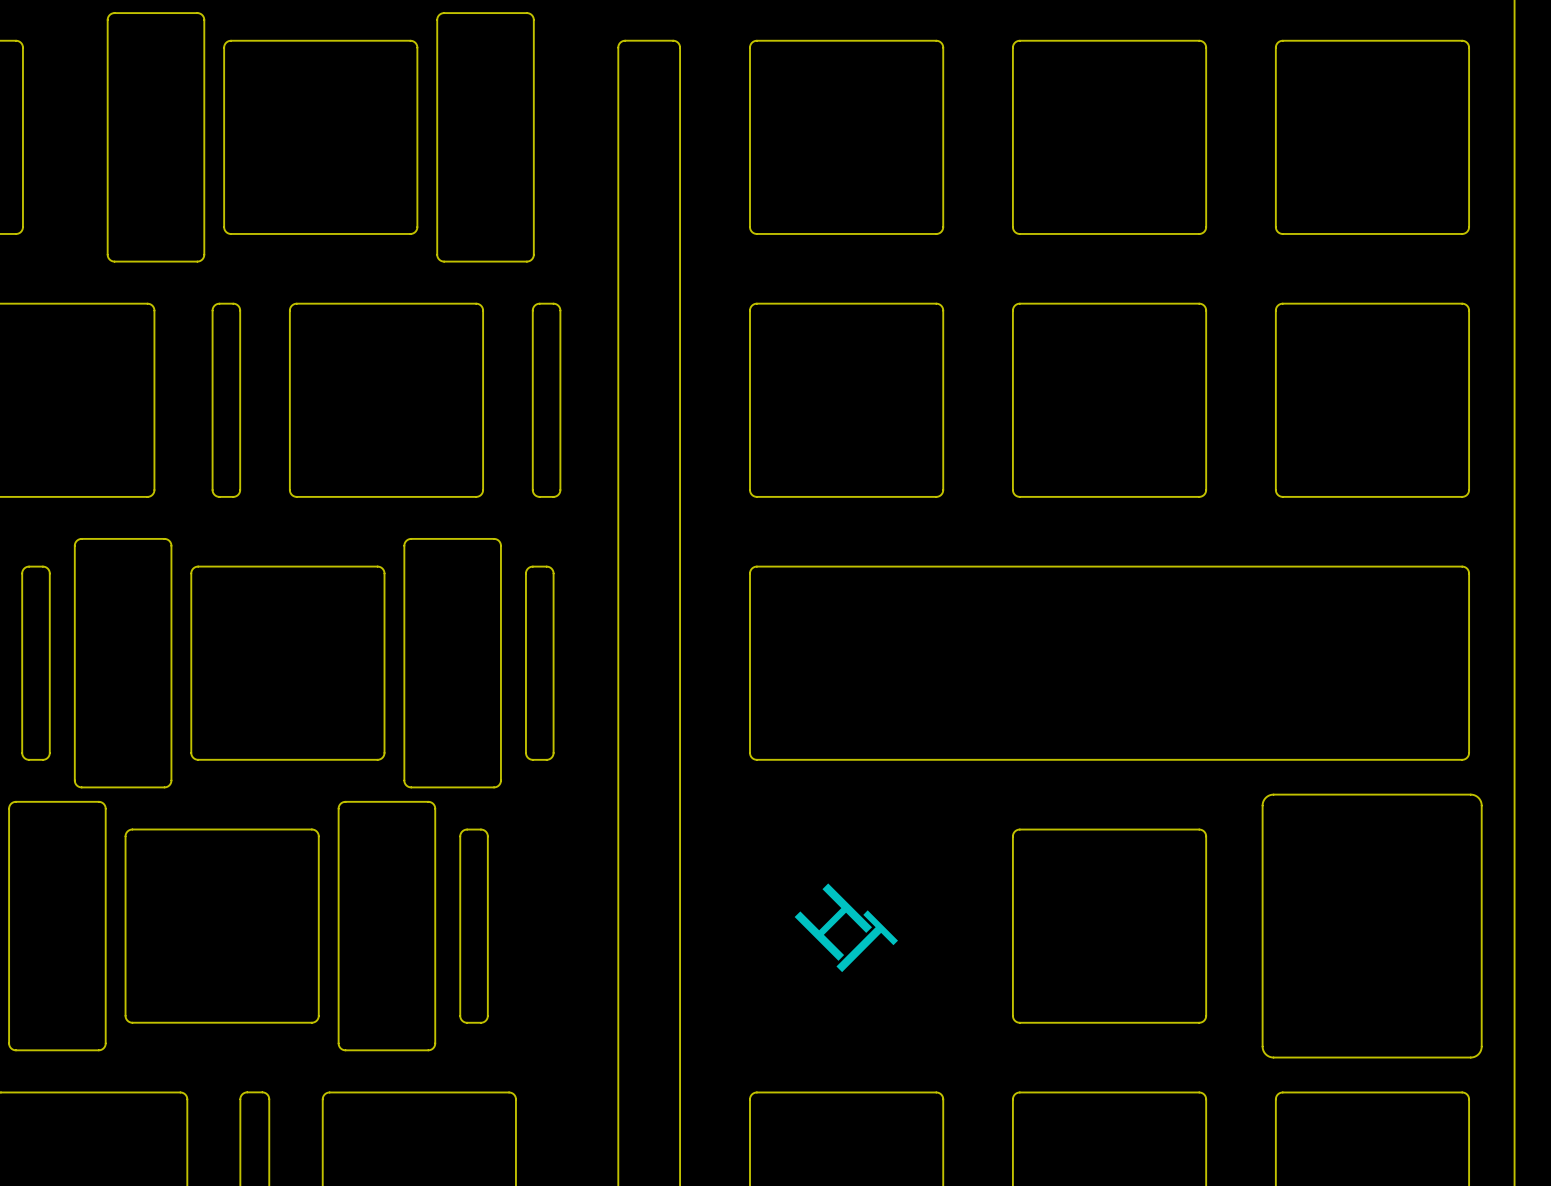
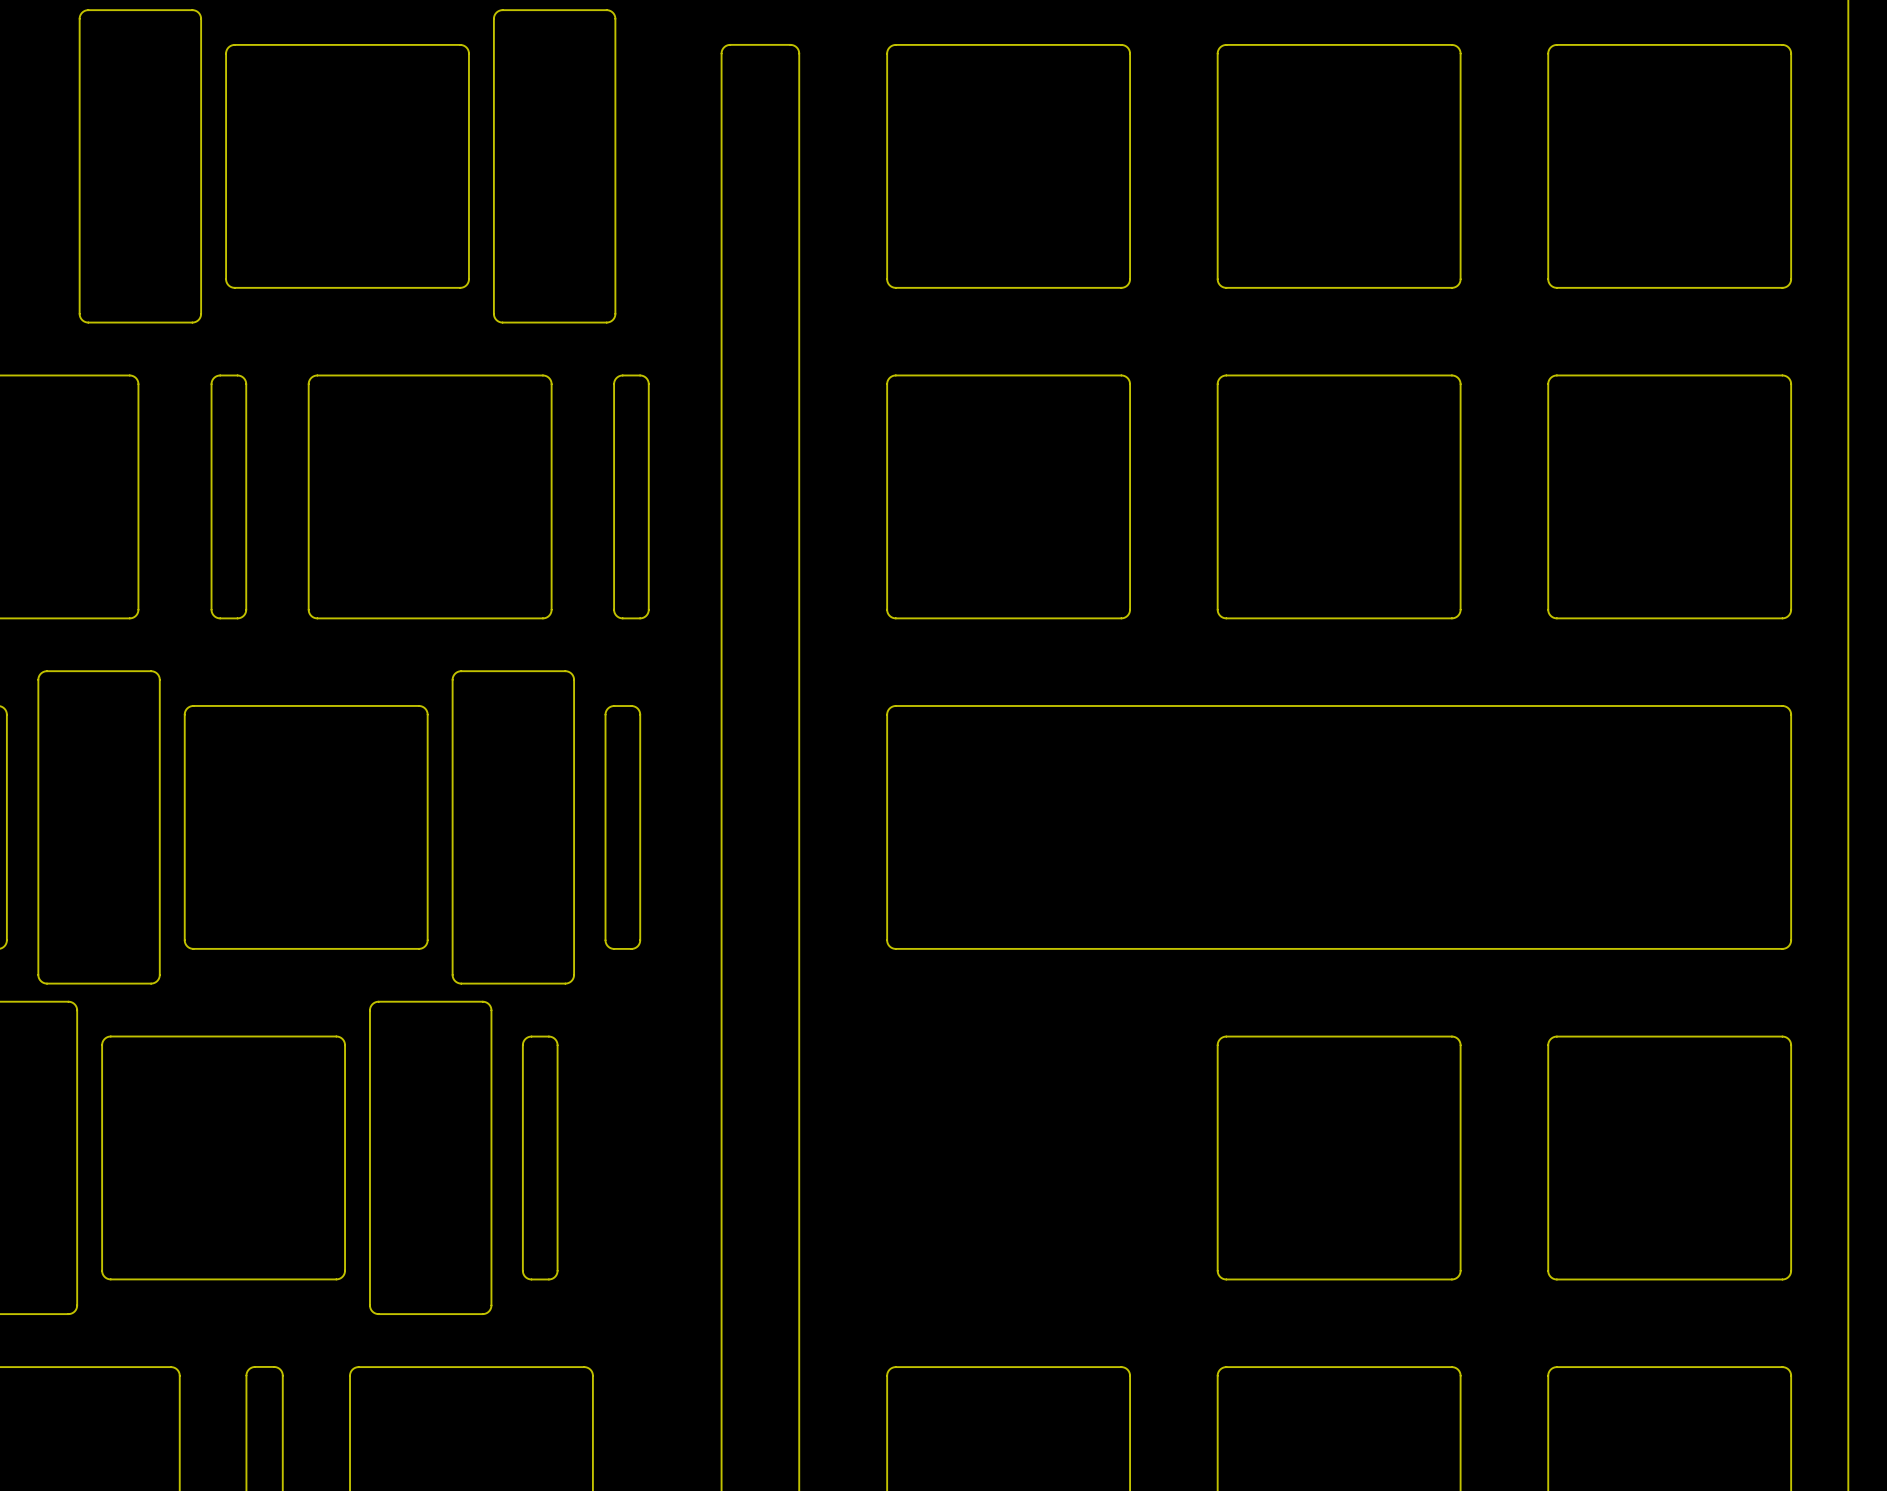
board edge: (1273, 794) (1470, 794) (1479, 798) (1481, 805) (1481, 1046) (1477, 1055) (1470, 1057) (1273, 1057) (1265, 1053) (1262, 1046) (1262, 805) (1265, 797) (1273, 794) -> (1556, 1036) (1550, 1039) (1548, 1045) (1548, 1270) (1550, 1276) (1556, 1279) (1782, 1279) (1788, 1276) (1791, 1270) (1791, 1045) (1788, 1039) (1782, 1036) (1556, 1036)
drawing: [794, 883, 899, 973] -> none

